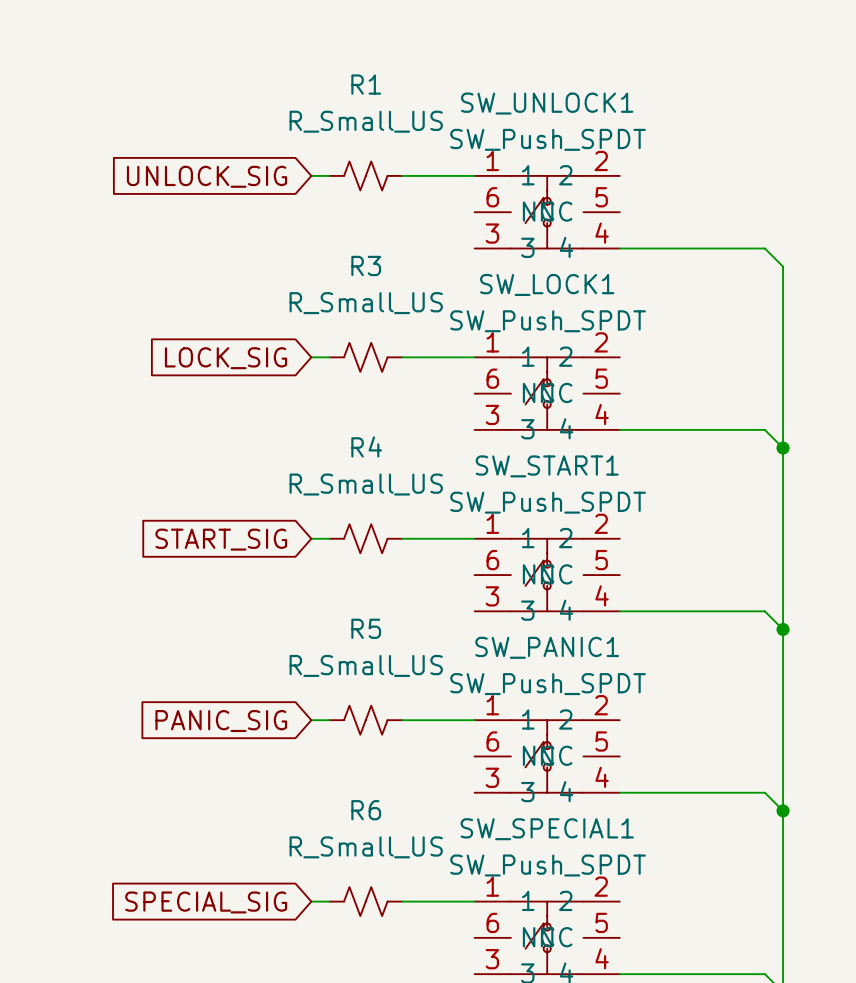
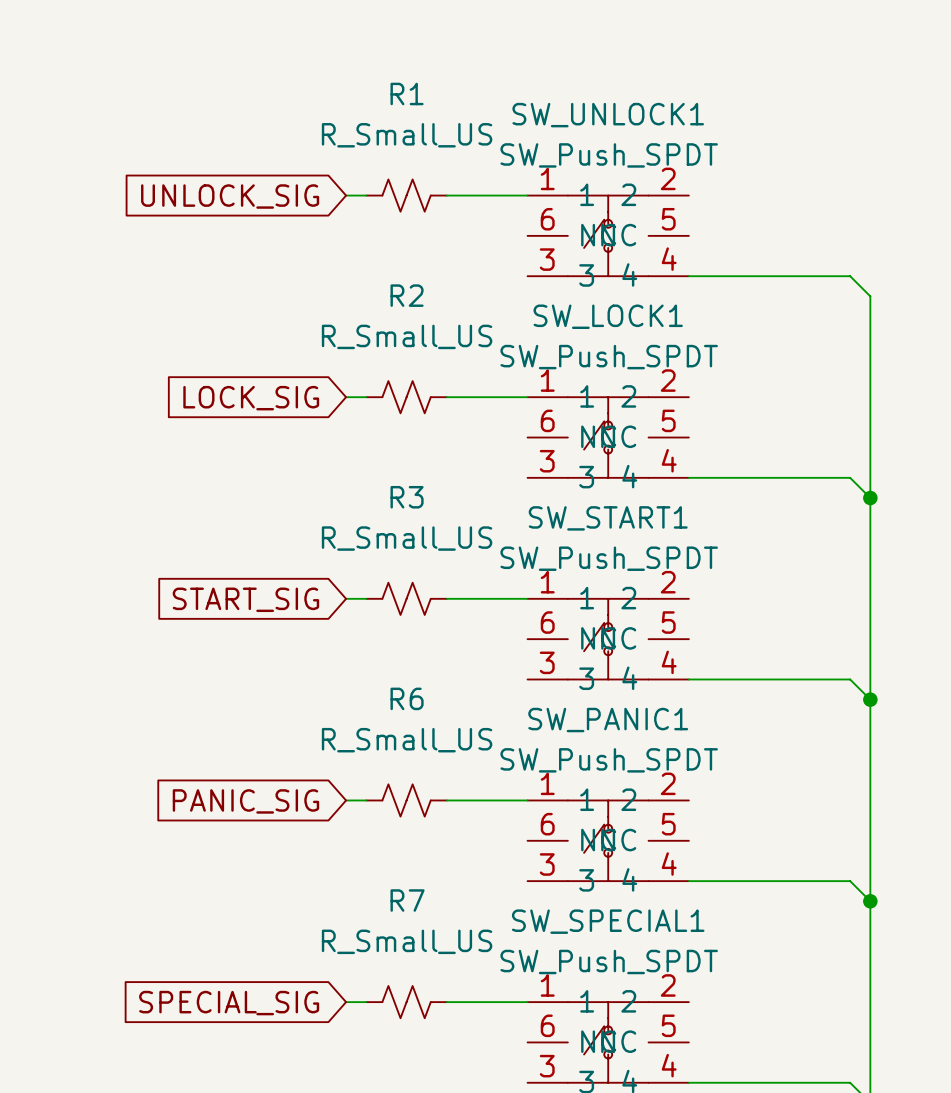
R3 name: R3 (366, 265) -> R2 (407, 295)
R4 name: R4 (366, 446) -> R3 (407, 497)
R5 name: R5 (366, 628) -> R6 (407, 698)
R6 name: R6 (366, 810) -> R7 (407, 900)

